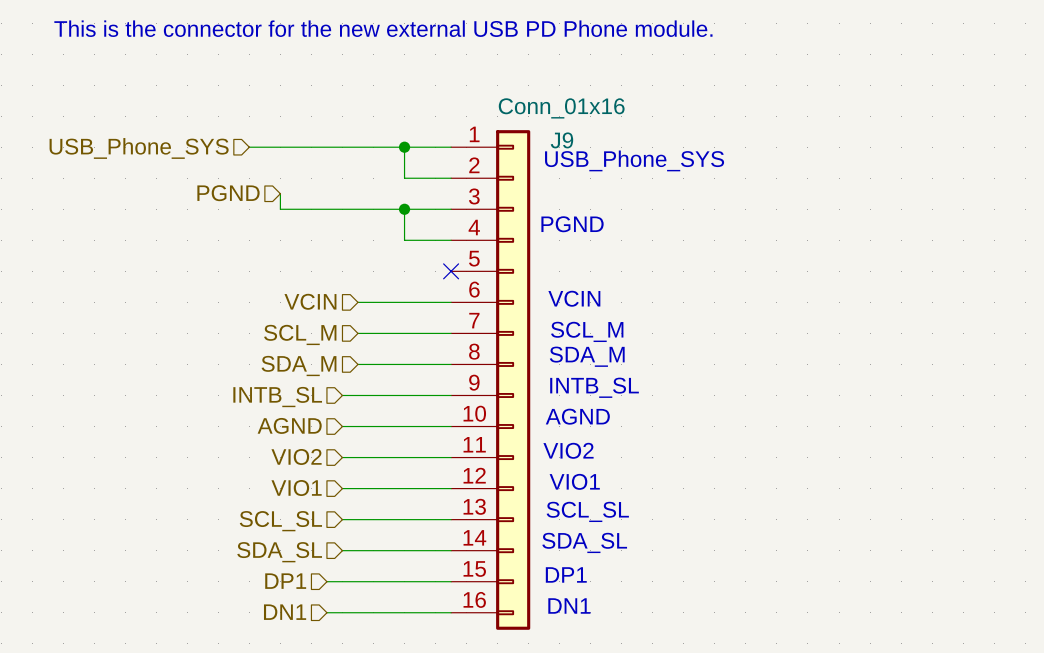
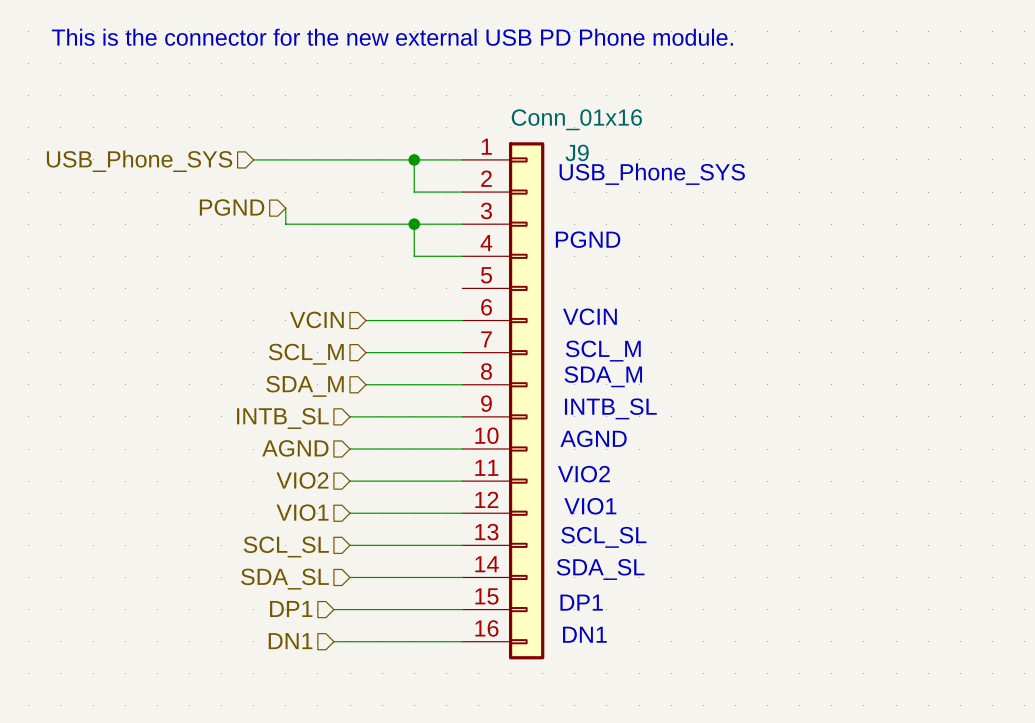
no-connect mark: (451, 271) -> none

